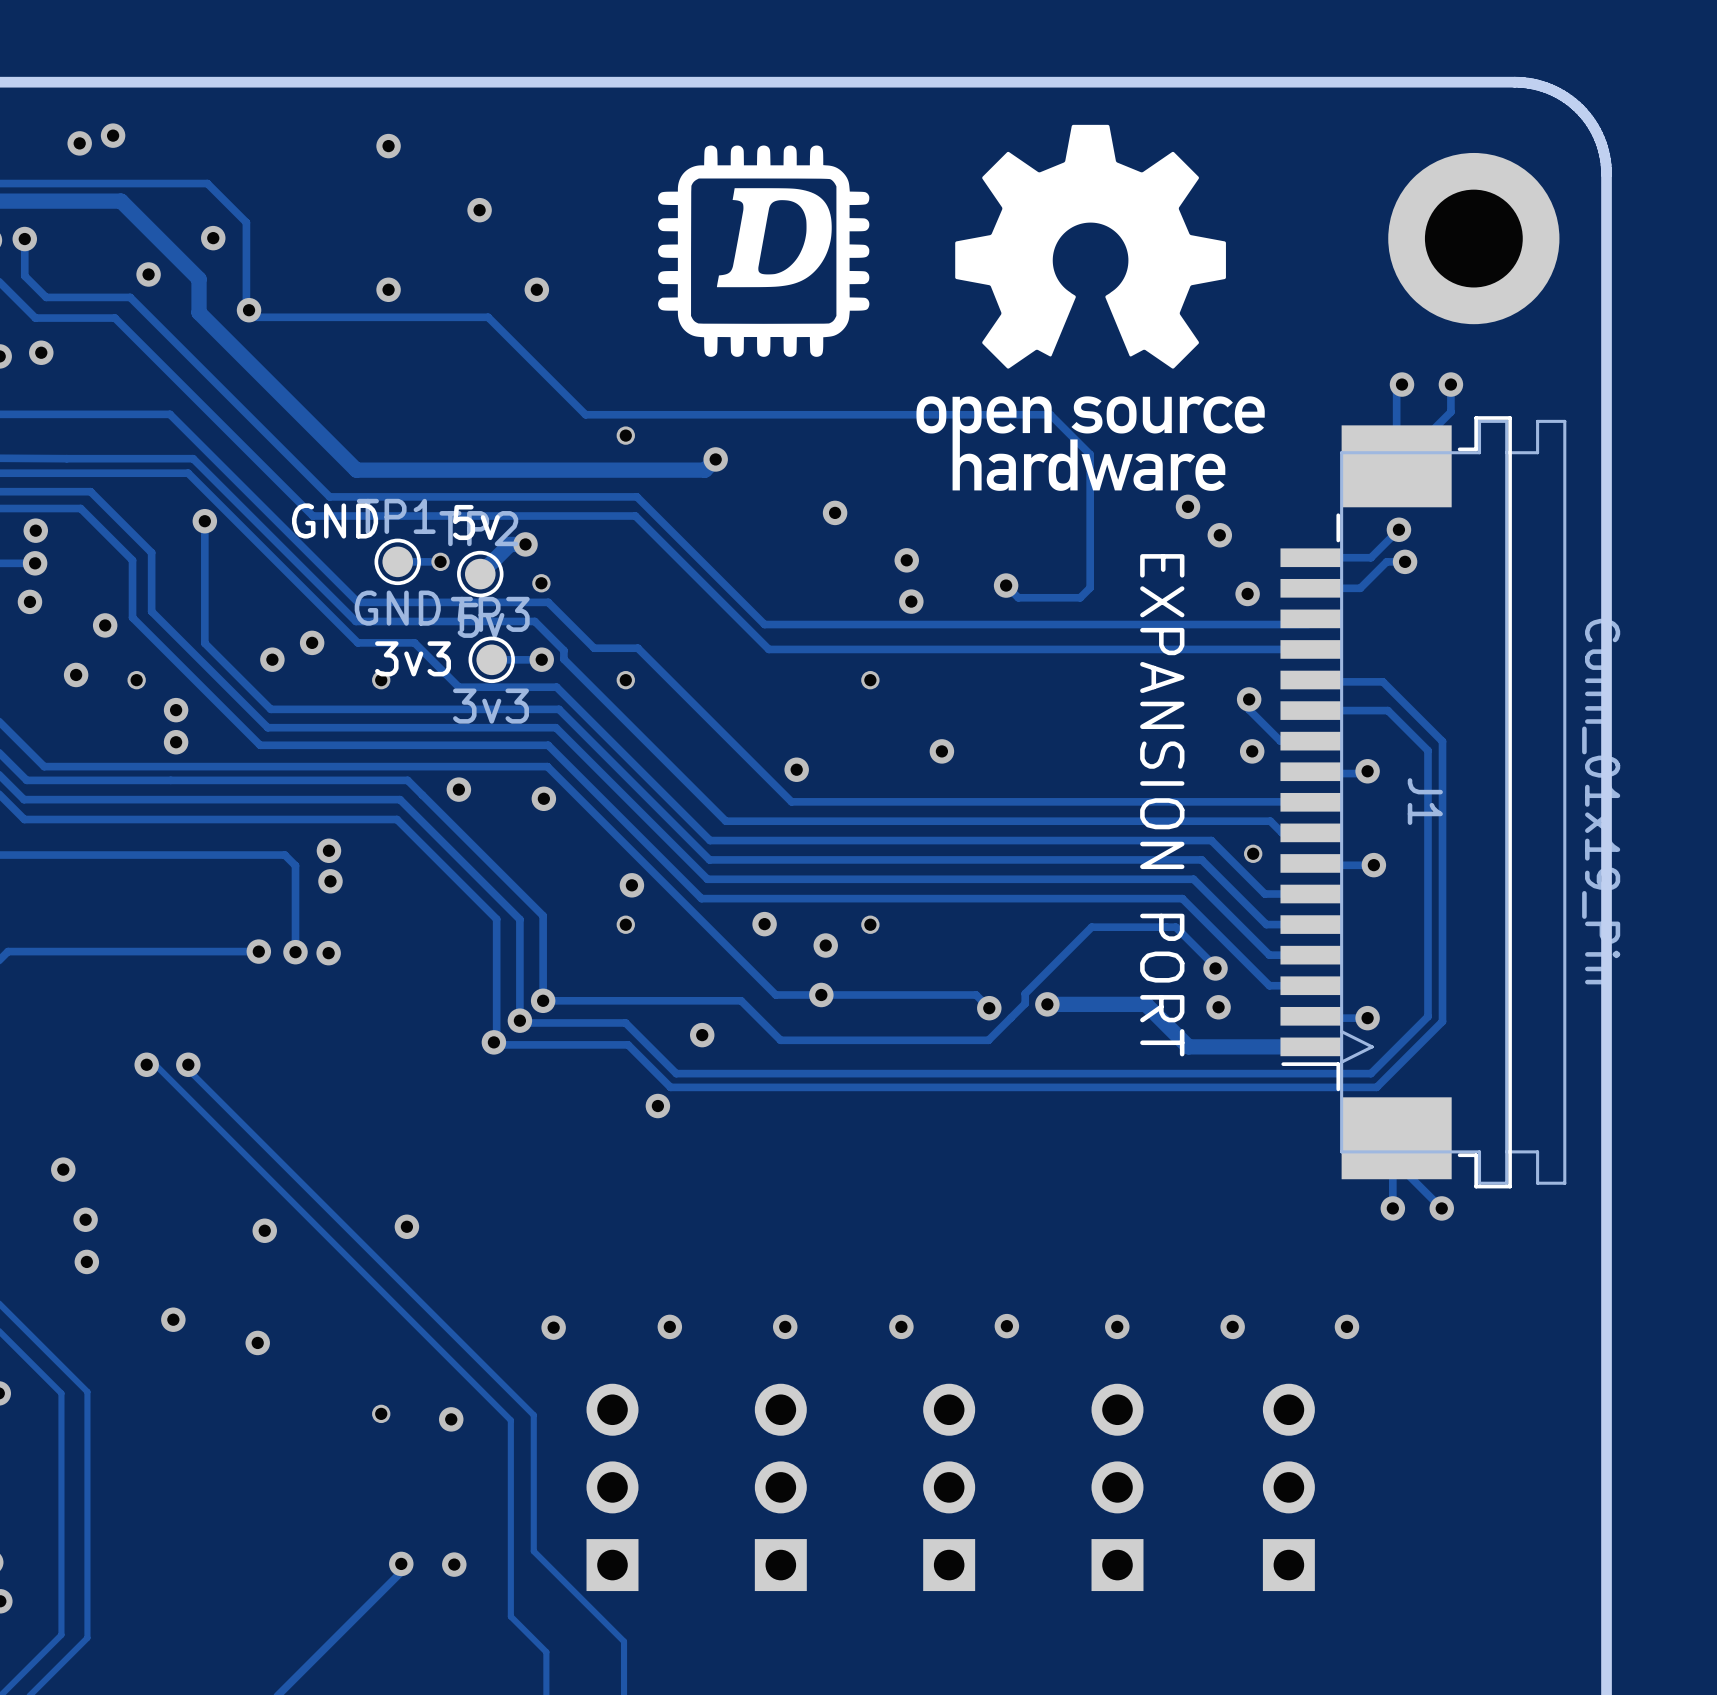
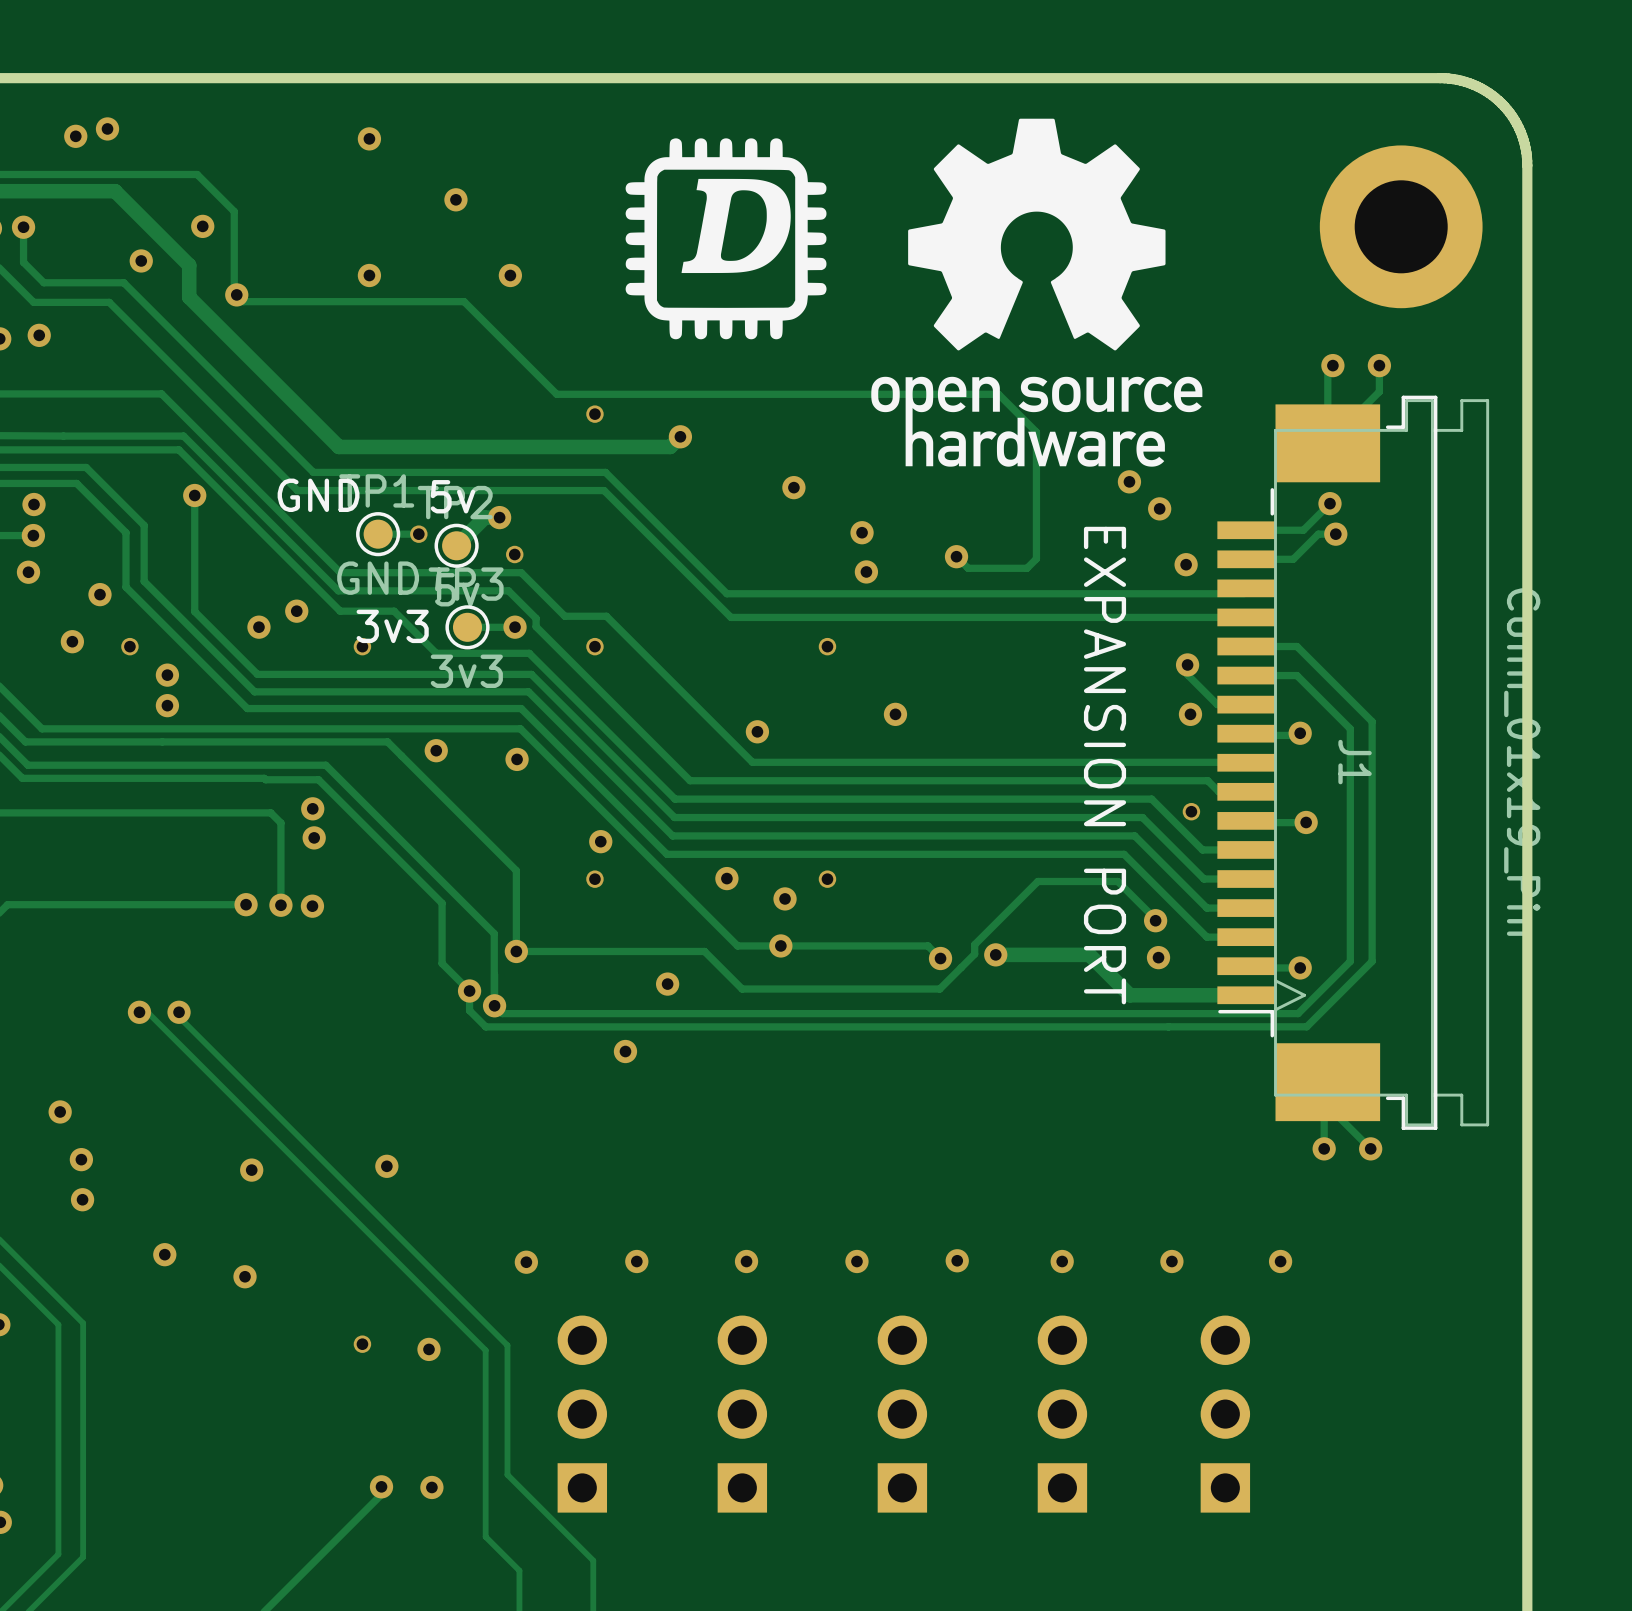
track: (1310, 681) (1382, 681) (1442, 741) (1442, 1021) (1376, 1087) (670, 1087) (628, 1044) (496, 1044) -> none
track: (1364, 710) (1387, 710) (1427, 750) (1427, 1016) (1370, 1073) (676, 1073) (625, 1022) (522, 1022) (519, 1020) -> (1297, 675) (1350, 728) (1350, 961) (1298, 1013) (502, 1013) (494, 1005) (494, 970)
track: (24, 799) (400, 799) (519, 919) (519, 982) -> (22, 760) (27, 765) (325, 765) (494, 933)
track: (23, 818) (397, 819) (496, 919) (496, 1039) -> (22, 778) (318, 779) (442, 903) (442, 963) (469, 991) (469, 1010) (485, 1026) (1306, 1026) (1372, 961) (1372, 721) (1297, 646) (1246, 646)
via position: (519, 1020) -> (494, 1005)

